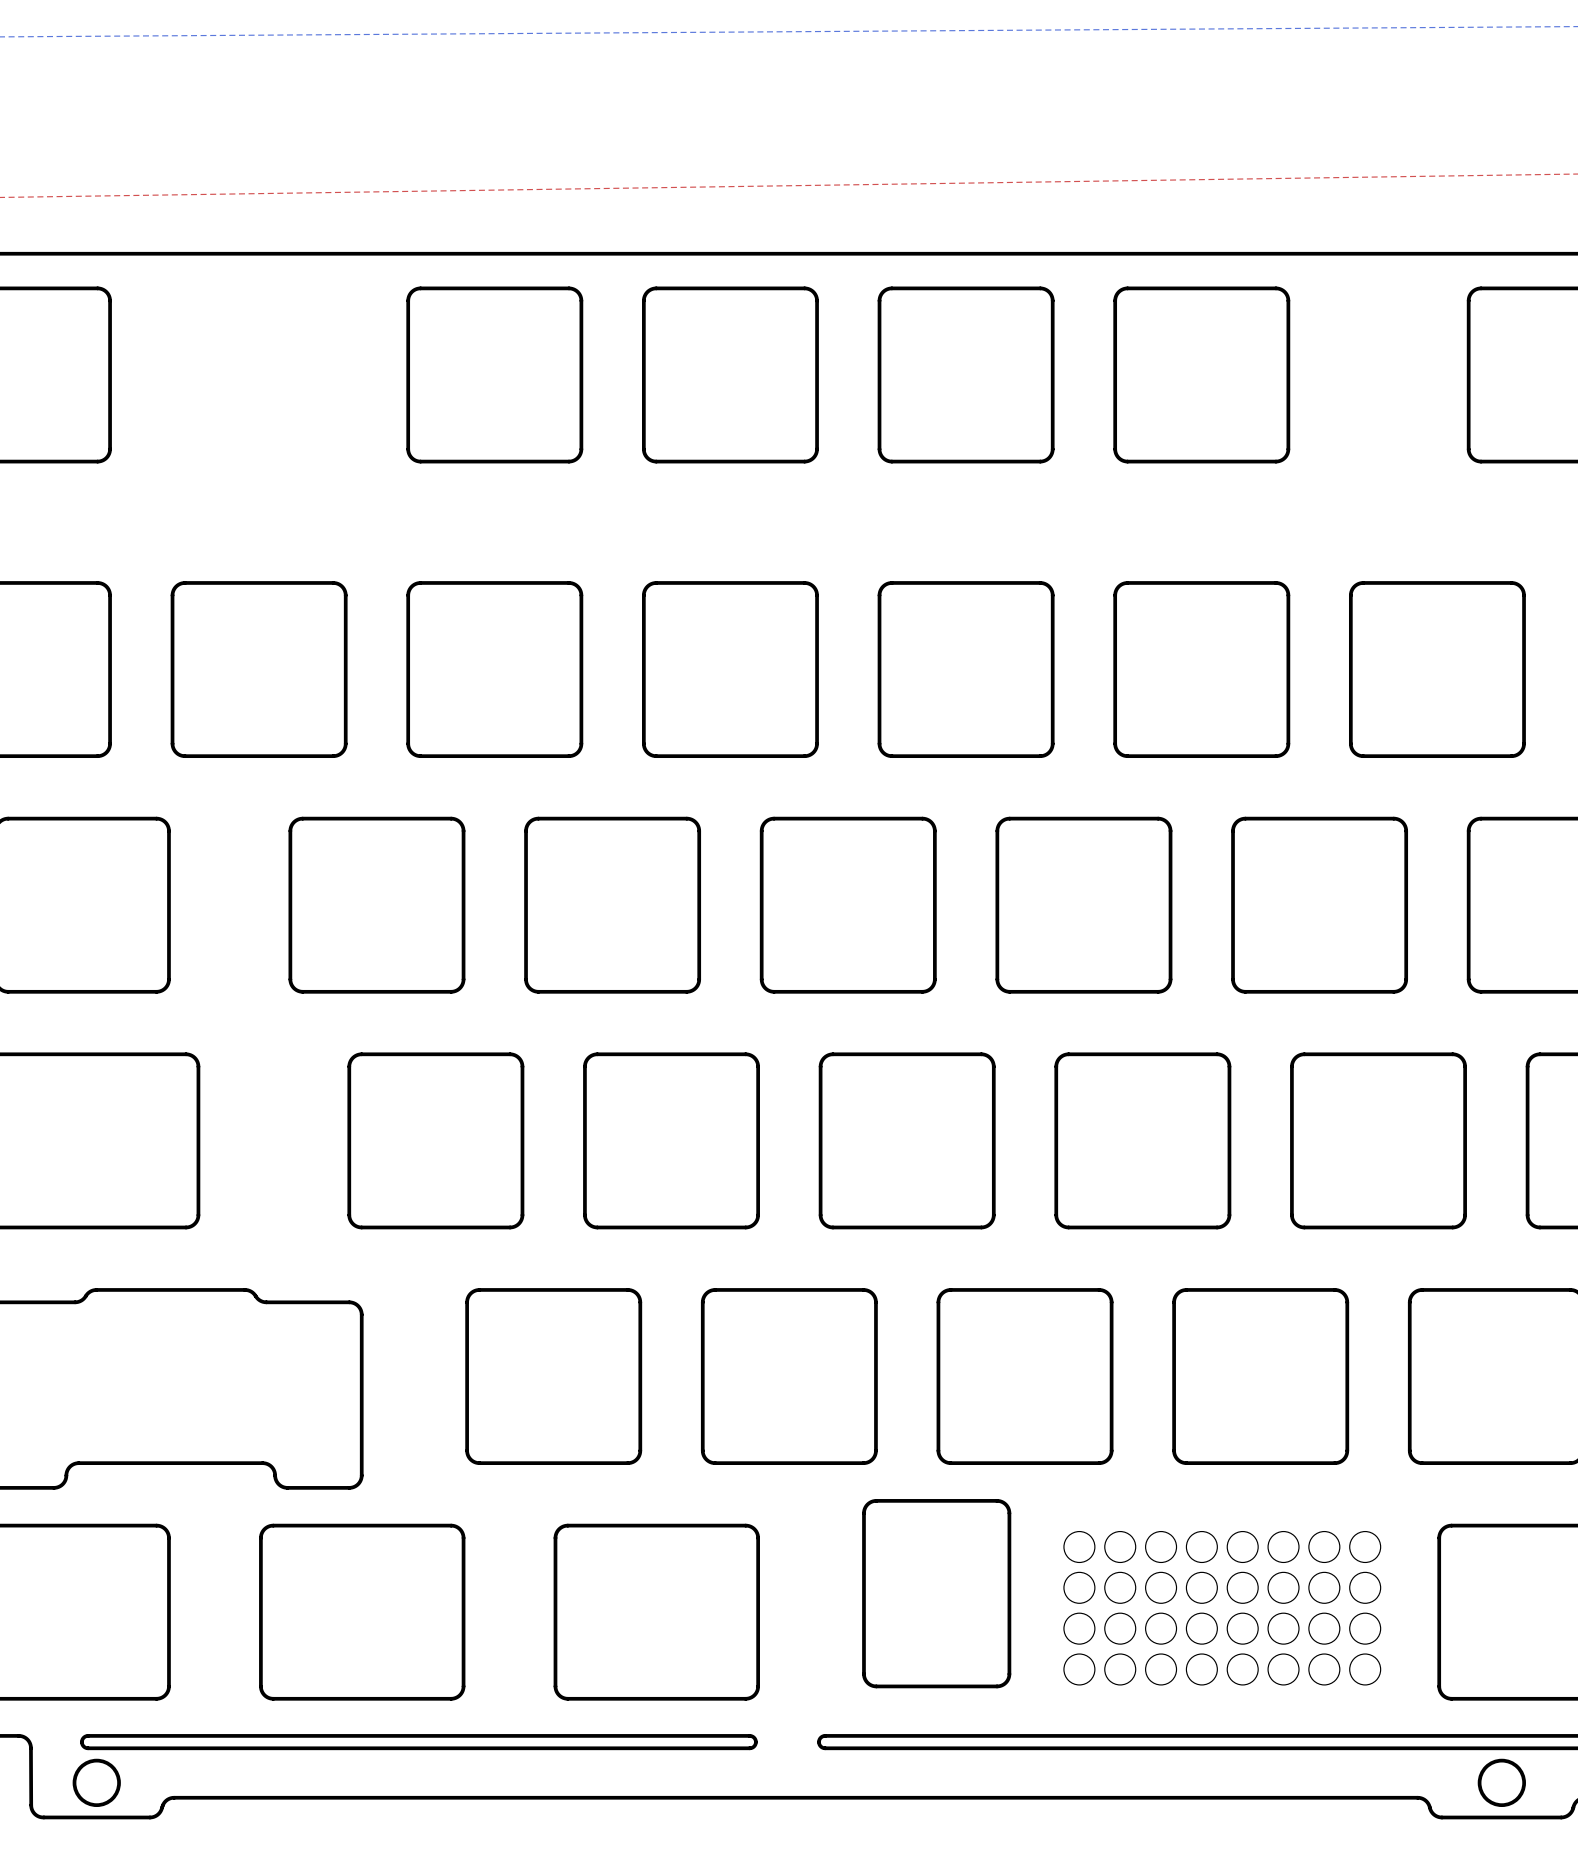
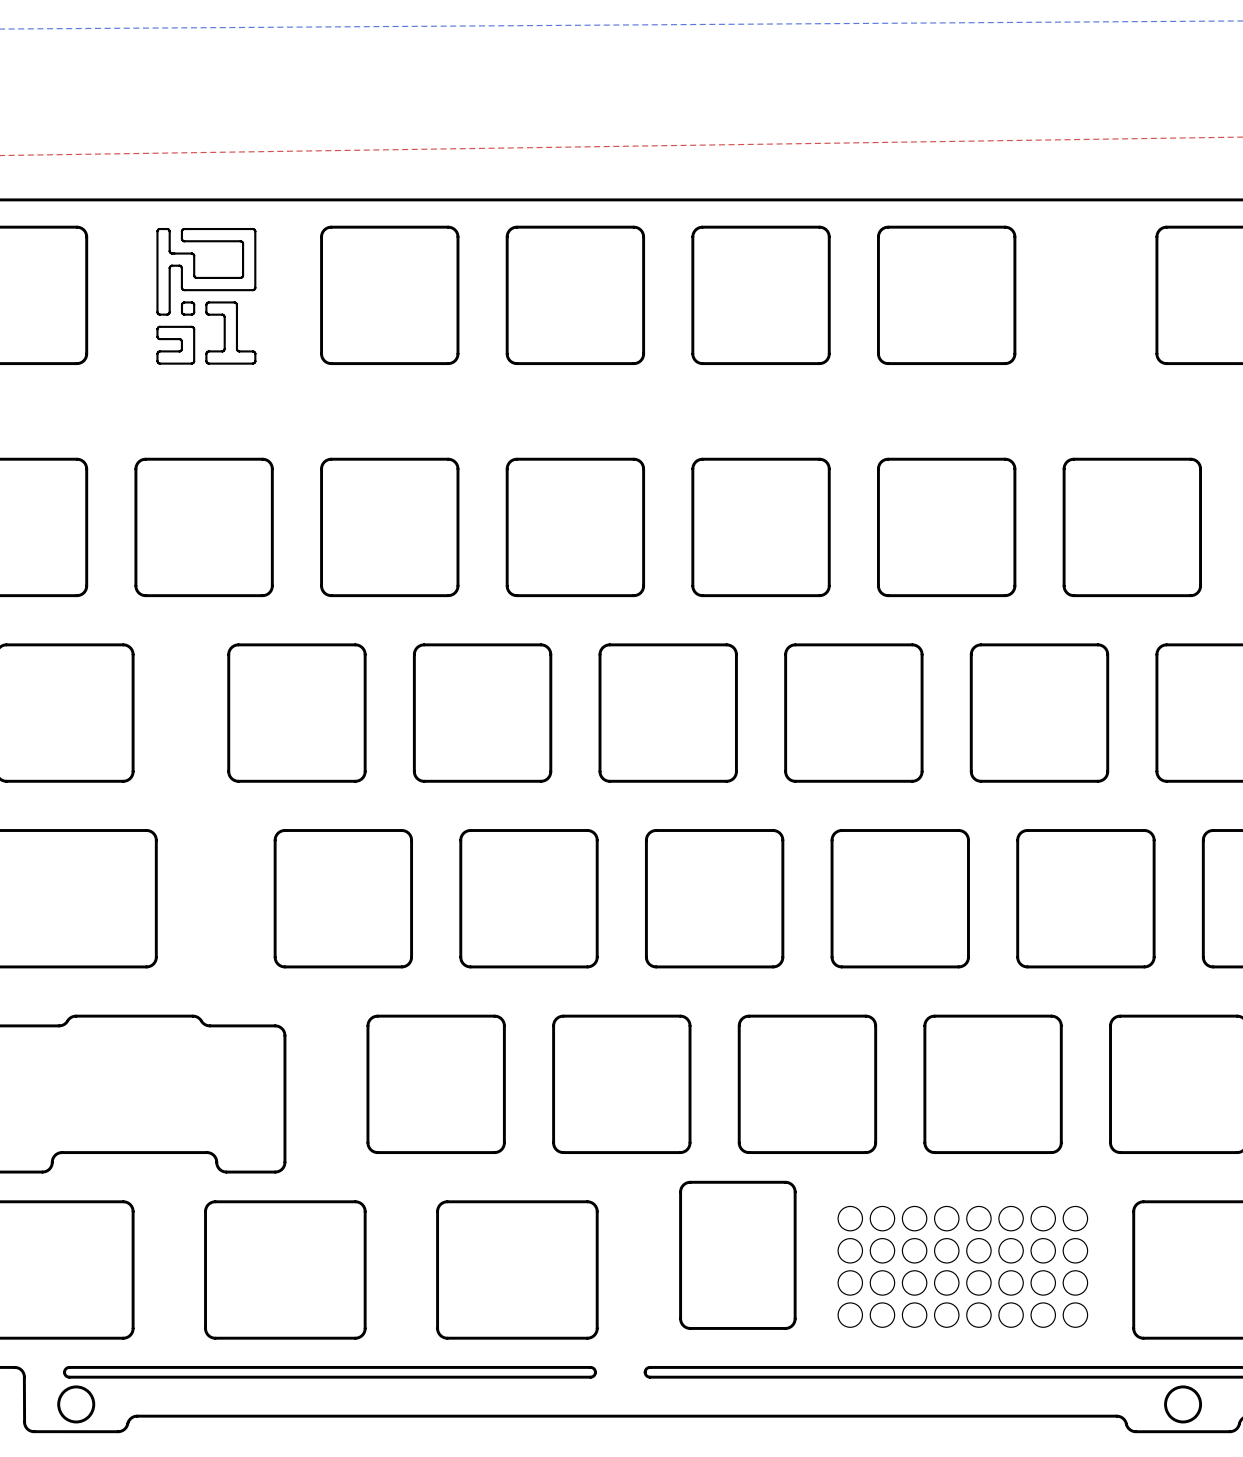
board edge: none -> (174, 253) (169, 251) (168, 229) (158, 229) (157, 312) (159, 314) (167, 314) (169, 312) (169, 267) (171, 265) (179, 265) (181, 267) (181, 288) (183, 290) (253, 290) (255, 288) (255, 231) (253, 229) (183, 229) (181, 231) (181, 239) (183, 241) (242, 241) (243, 275) (241, 277) (196, 277) (194, 275) (193, 254) (174, 253)
board edge: none -> (183, 302) (193, 303) (193, 313) (182, 313) (181, 304) (183, 302)
board edge: none -> (208, 302) (236, 303) (236, 349) (239, 351) (254, 352) (254, 362) (207, 362) (207, 352) (222, 351) (224, 349) (224, 316) (222, 314) (207, 313) (206, 304) (208, 302)
board edge: none -> (159, 326) (193, 327) (193, 362) (158, 362) (158, 352) (179, 351) (181, 349) (181, 341) (179, 339) (158, 338) (157, 328) (159, 326)

